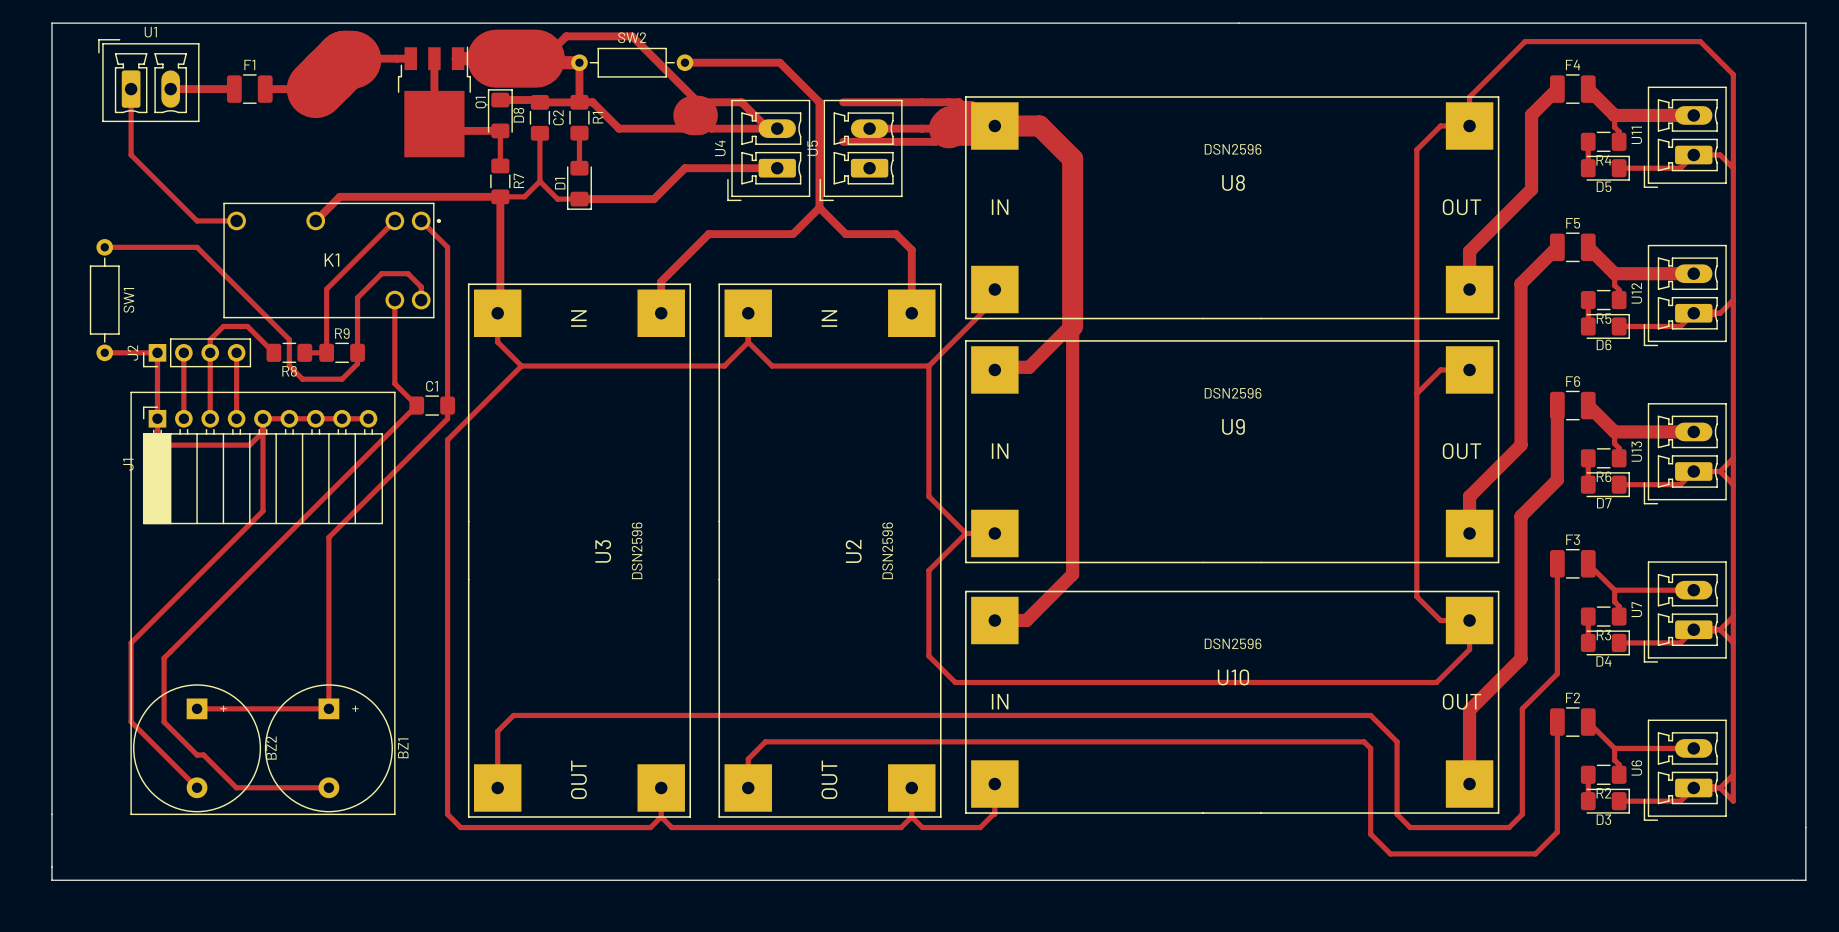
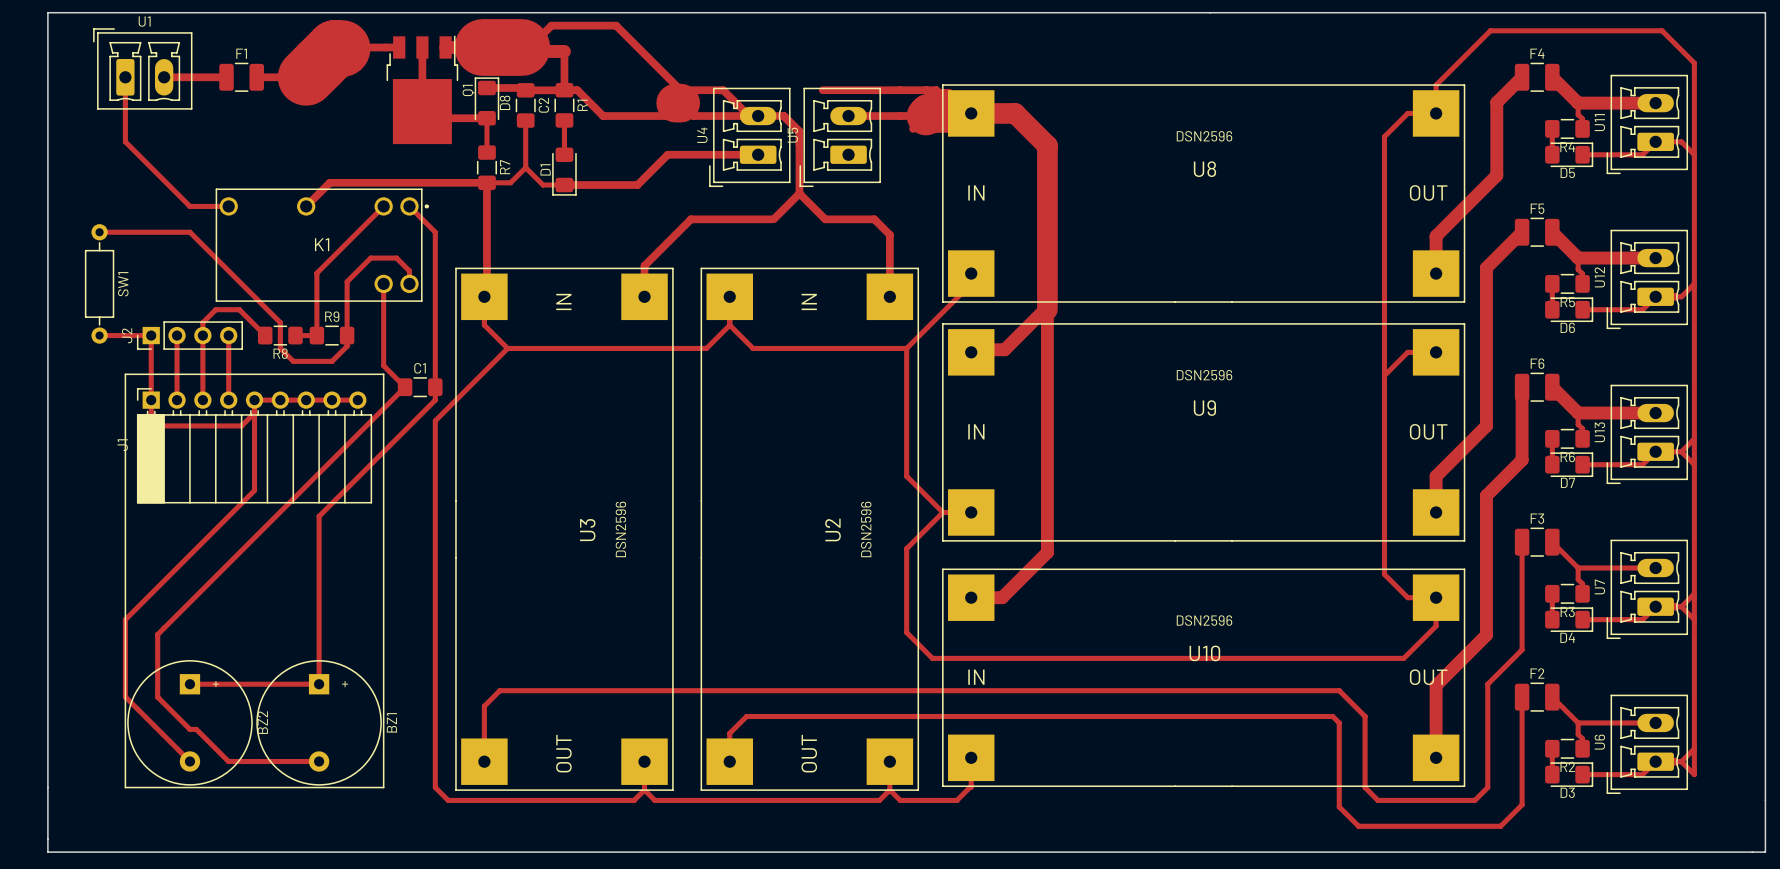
SW2: (632, 62) -> none
track: (684, 62) (779, 62) (819, 102) (819, 144) -> (799, 144) (799, 133) (781, 116) (758, 116) (784, 116) (799, 131)
track: (843, 141) (935, 141) -> none

